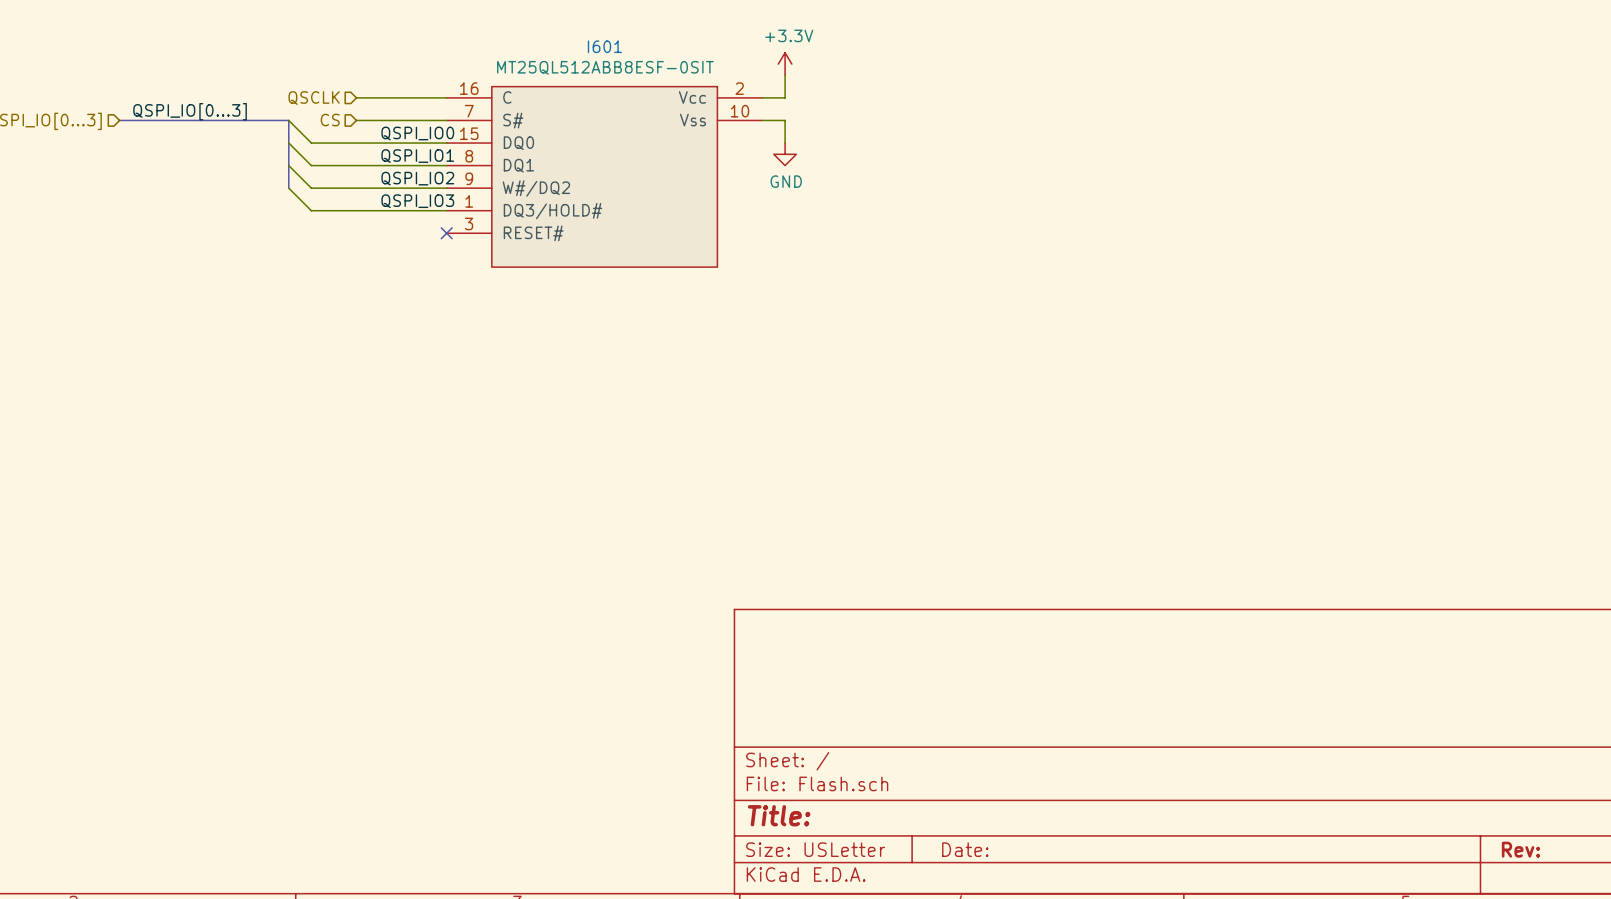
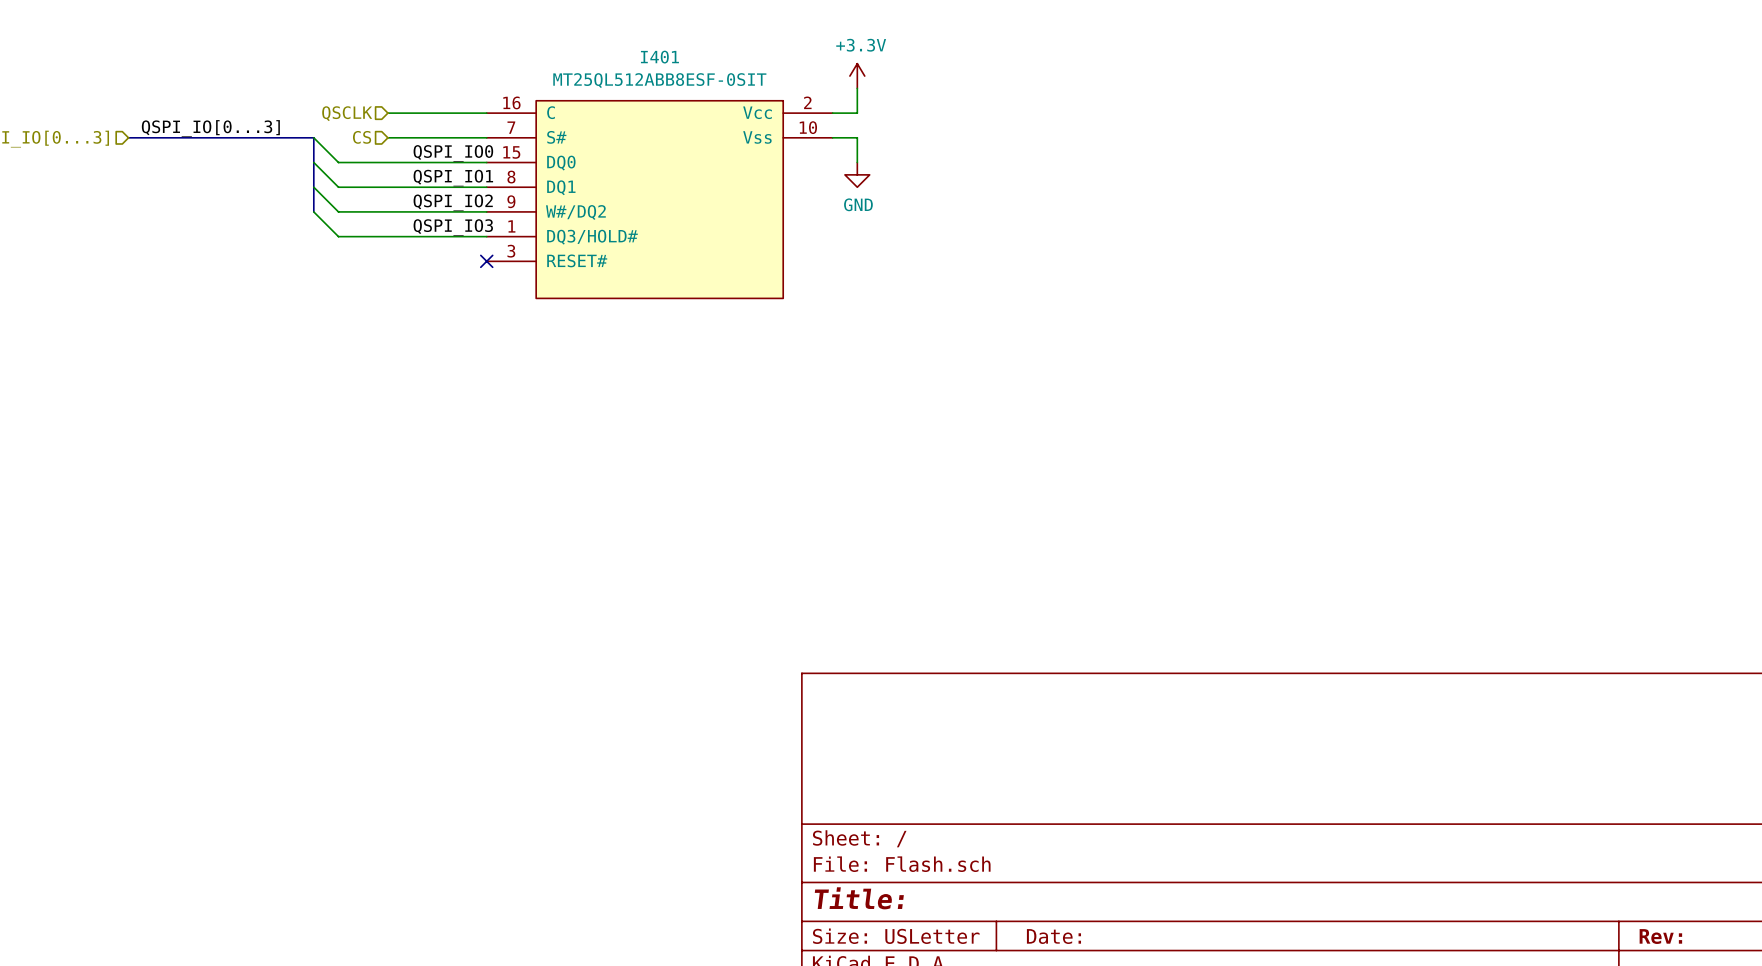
I601 name: I601 (604, 46) -> I401 (659, 57)

